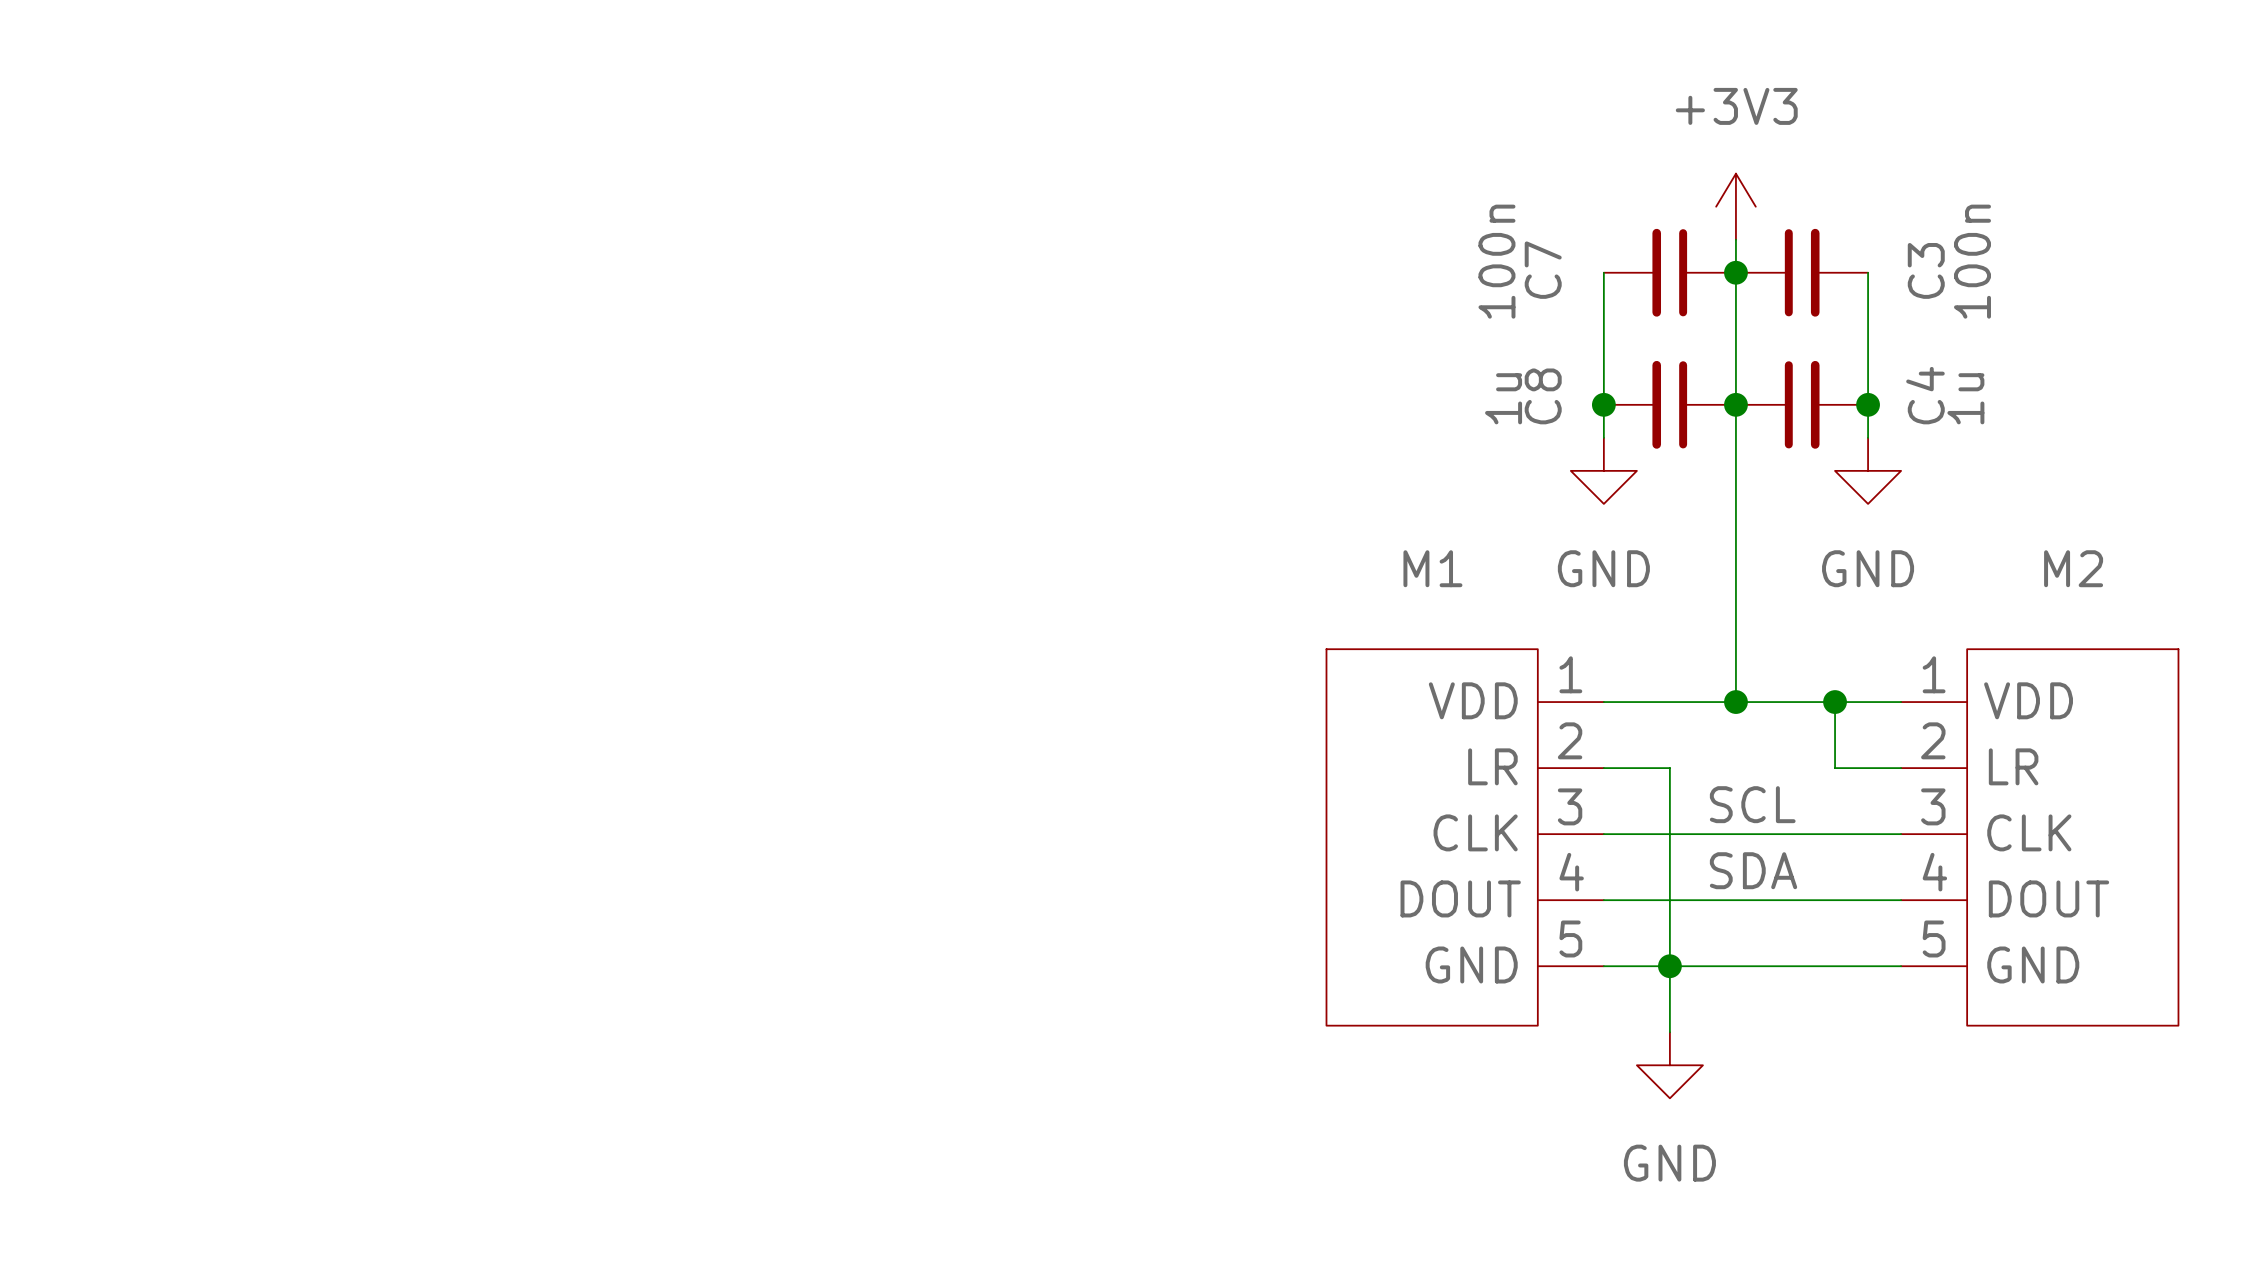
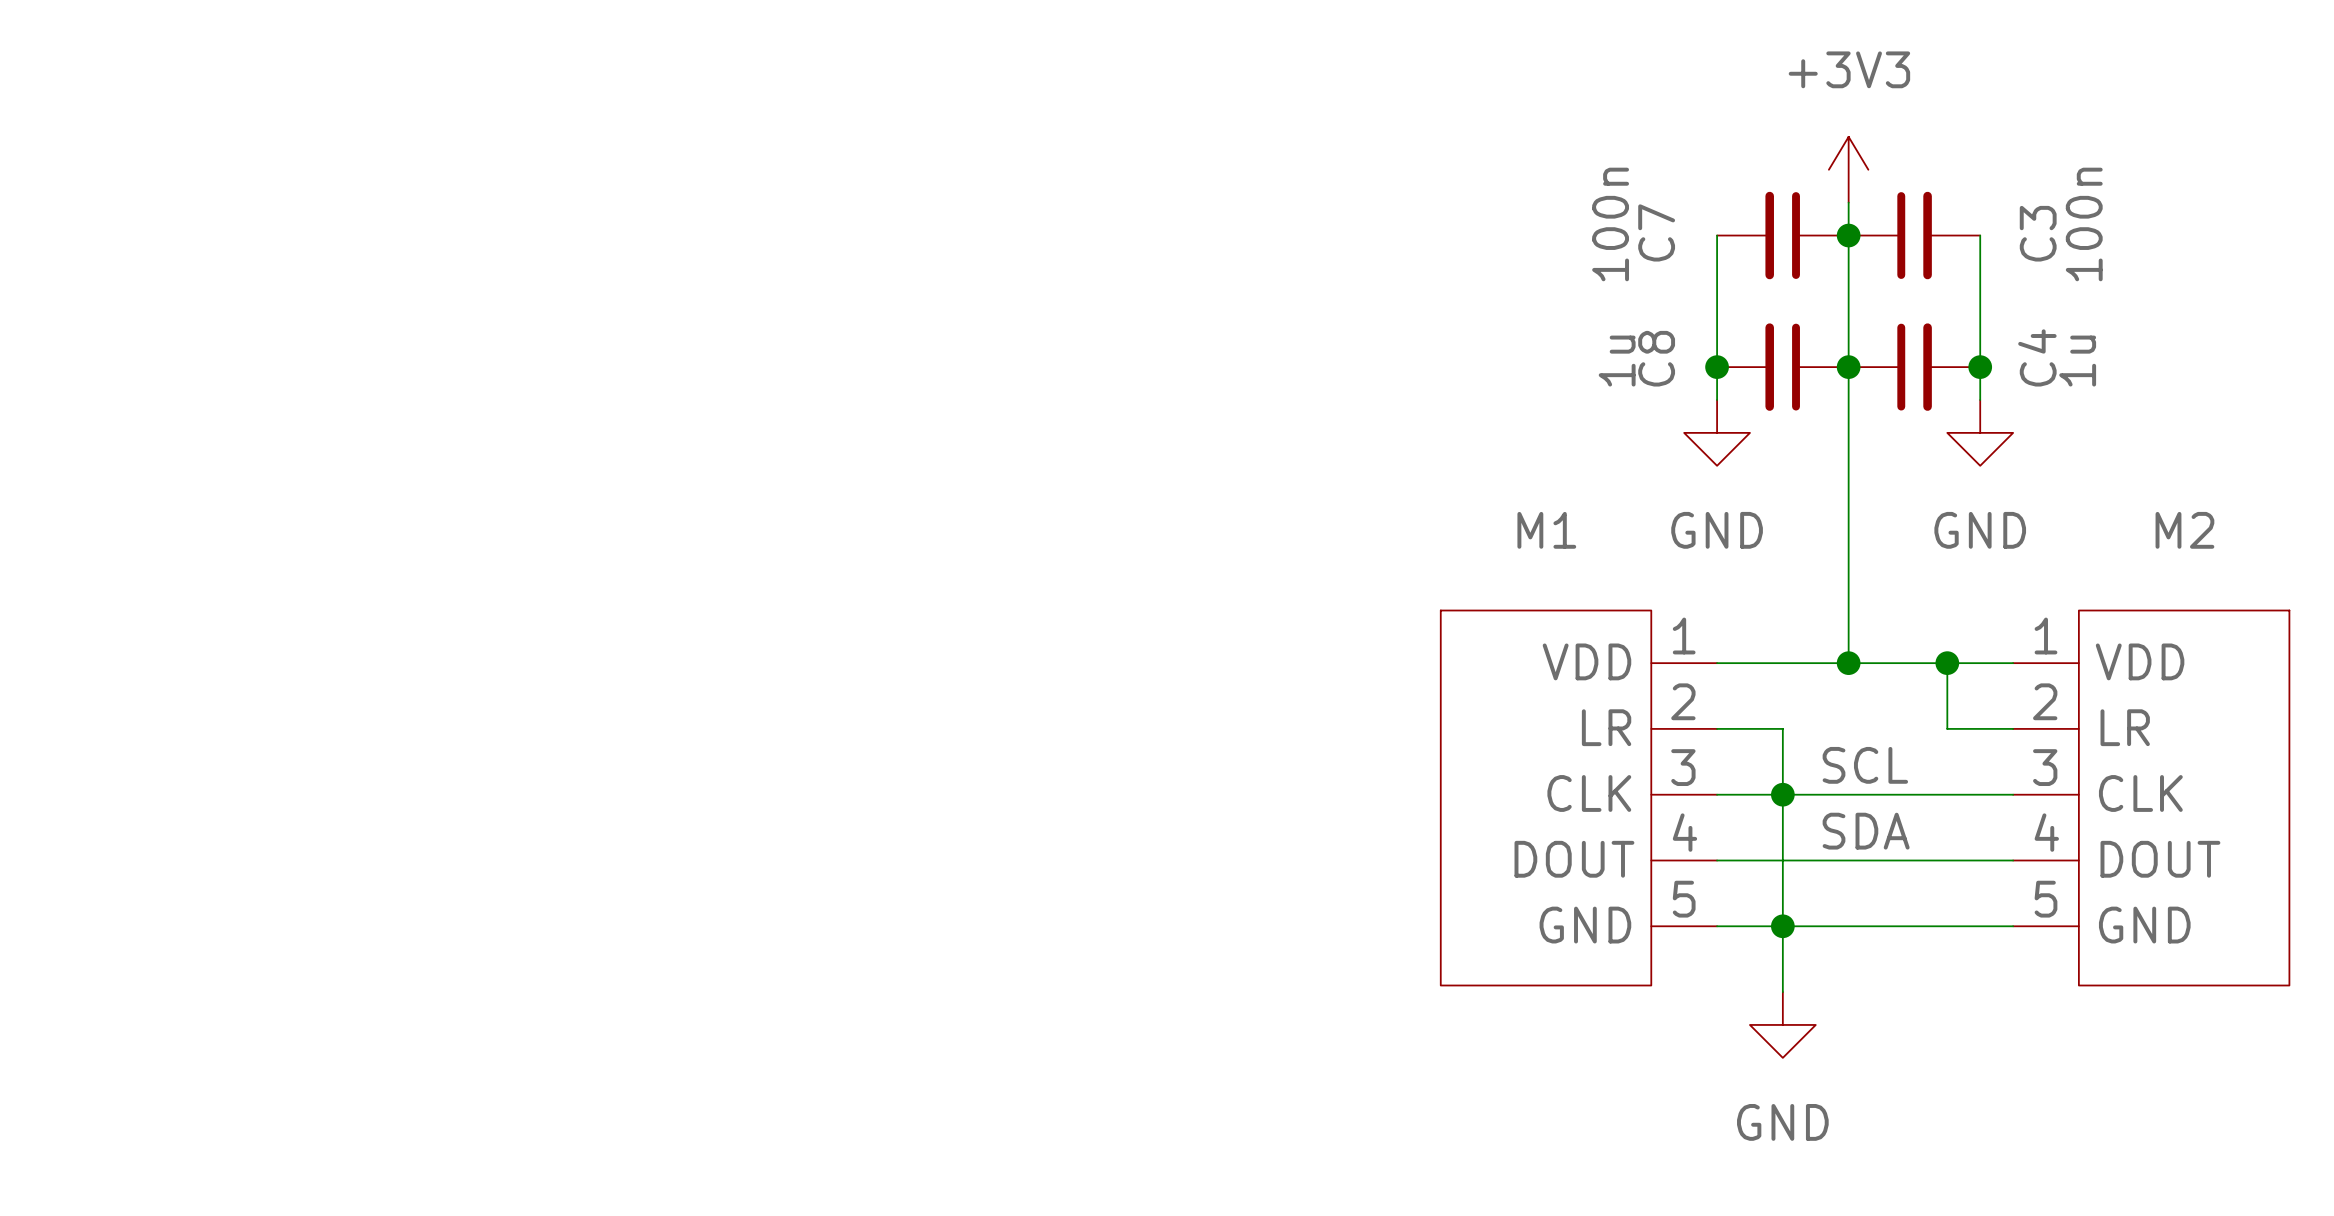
junction: none -> (1782, 794)

